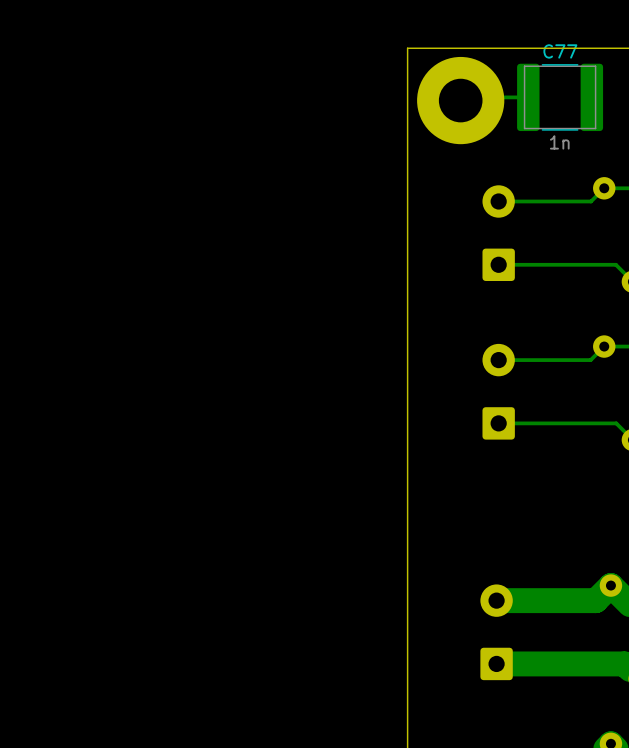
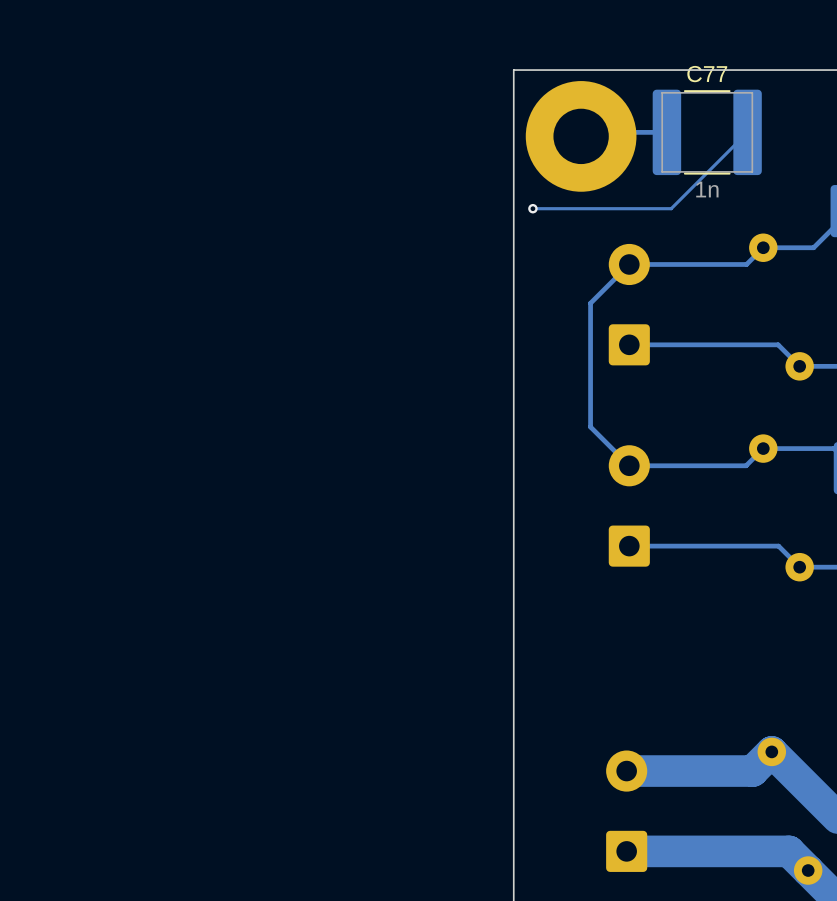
bottom track: none -> (747, 132) (671, 208) (532, 208)
via: none -> (532, 208)
bottom track: none -> (629, 264) (590, 303) (590, 427) (629, 465)

